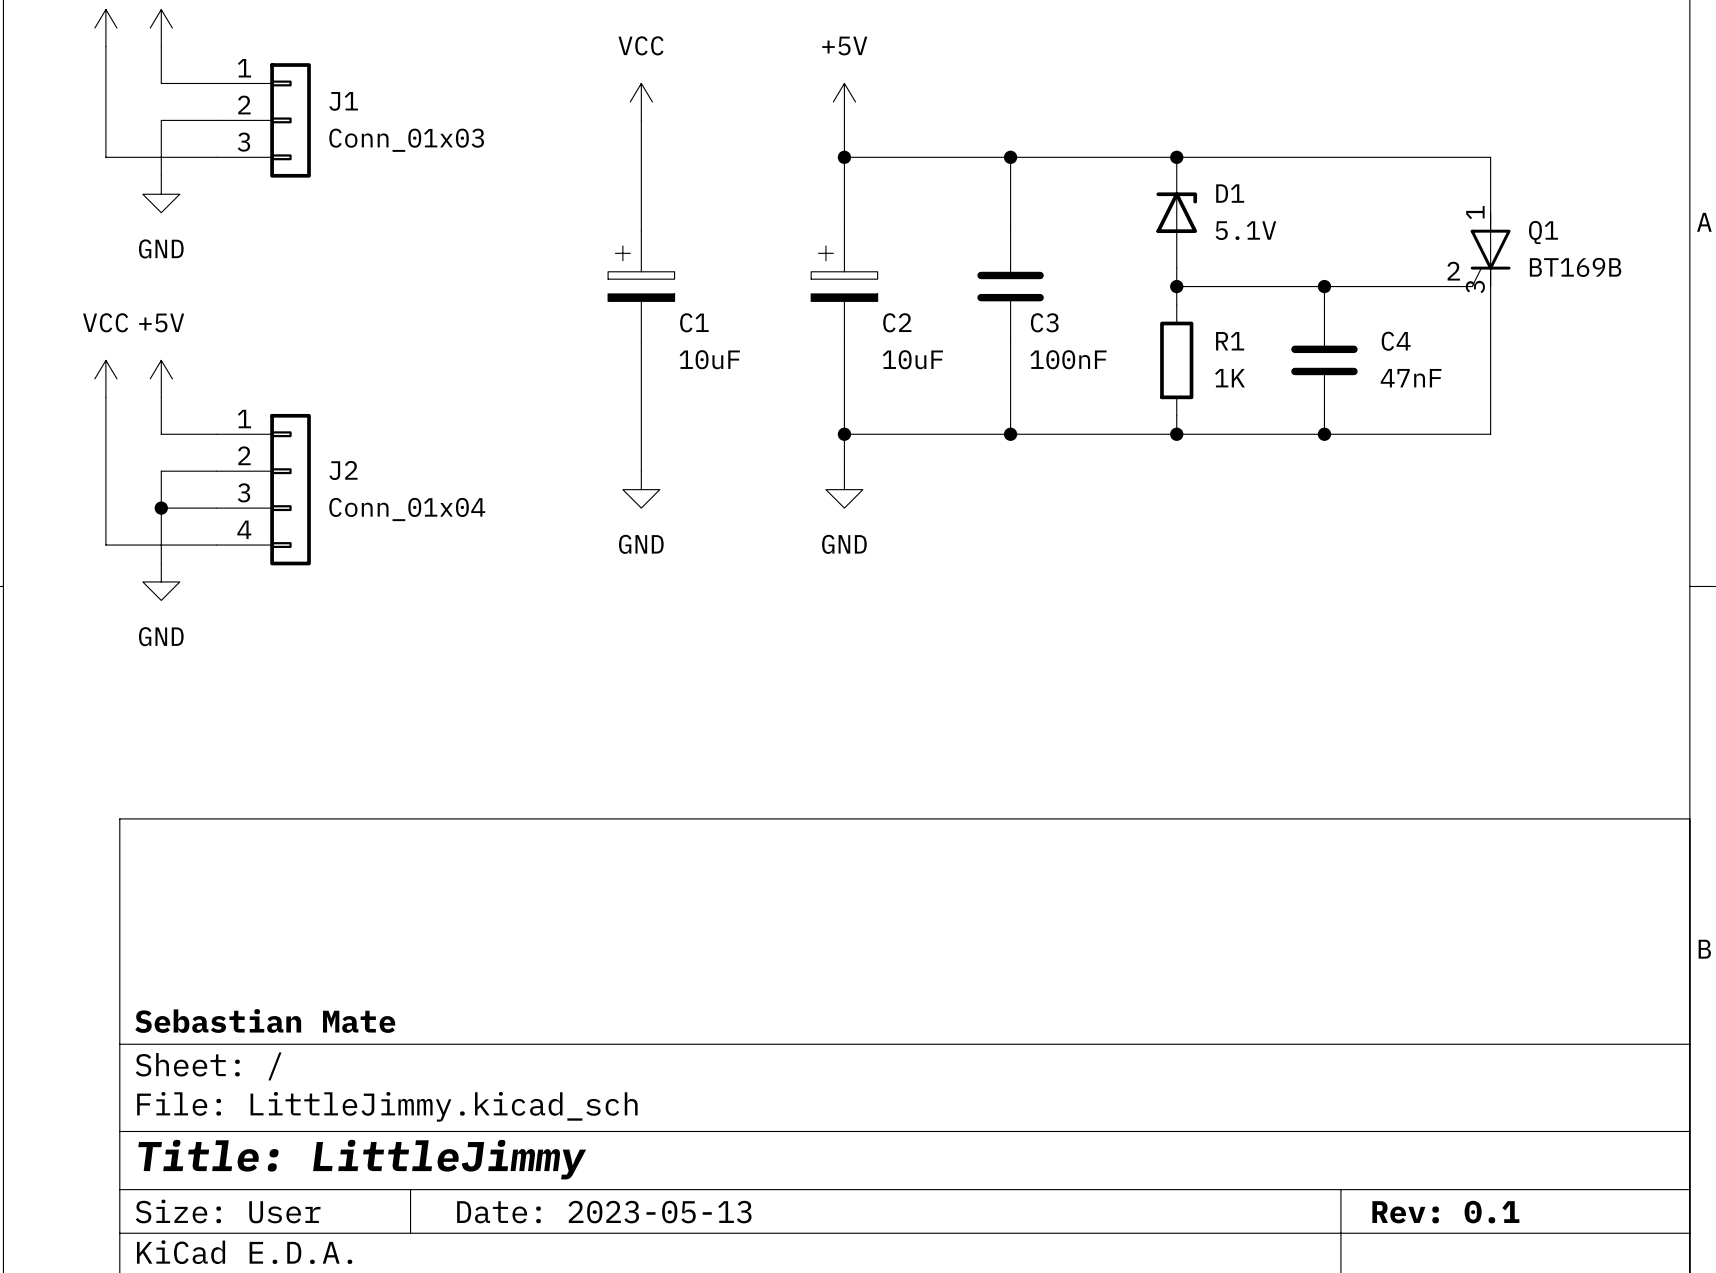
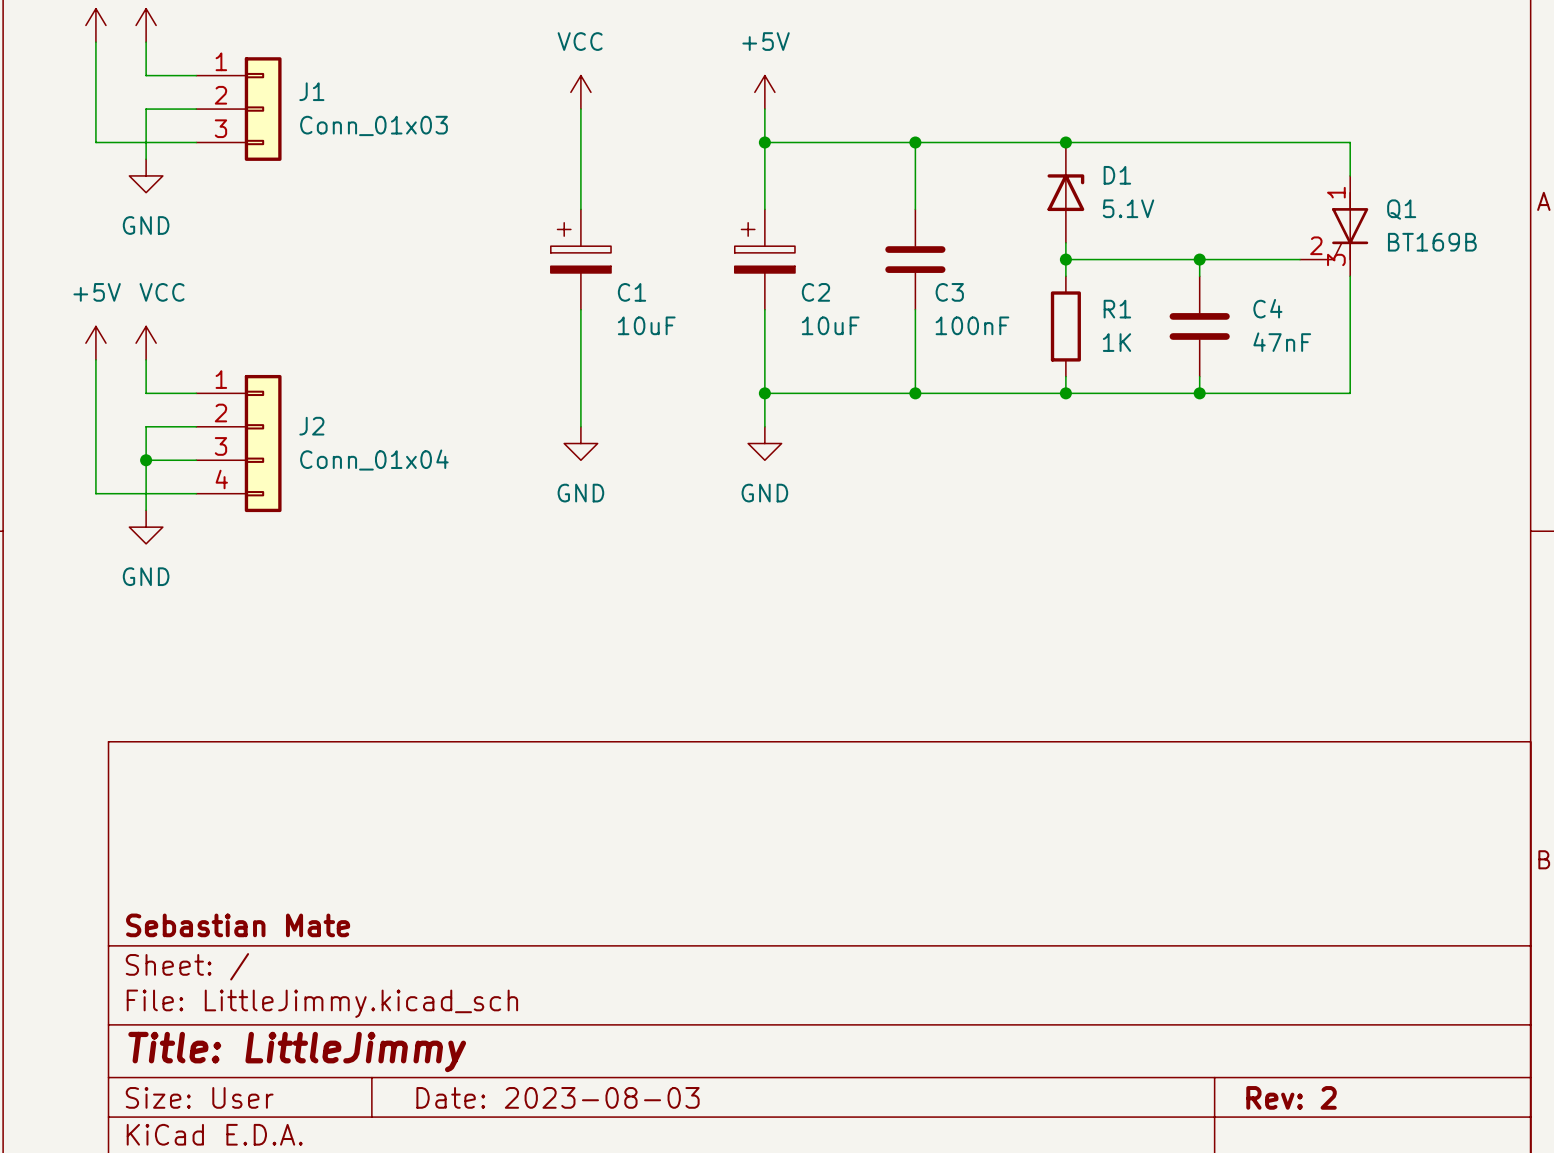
power symbol: VCC (105, 378) -> +5V (95, 343)
power symbol: +5V (161, 378) -> VCC (146, 343)
title block: Date: 2023-05-13 (604, 1212) -> Date: 2023-08-03 (558, 1097)
title block: Rev: 0.1 (1445, 1212) -> Rev: 2 (1291, 1097)

